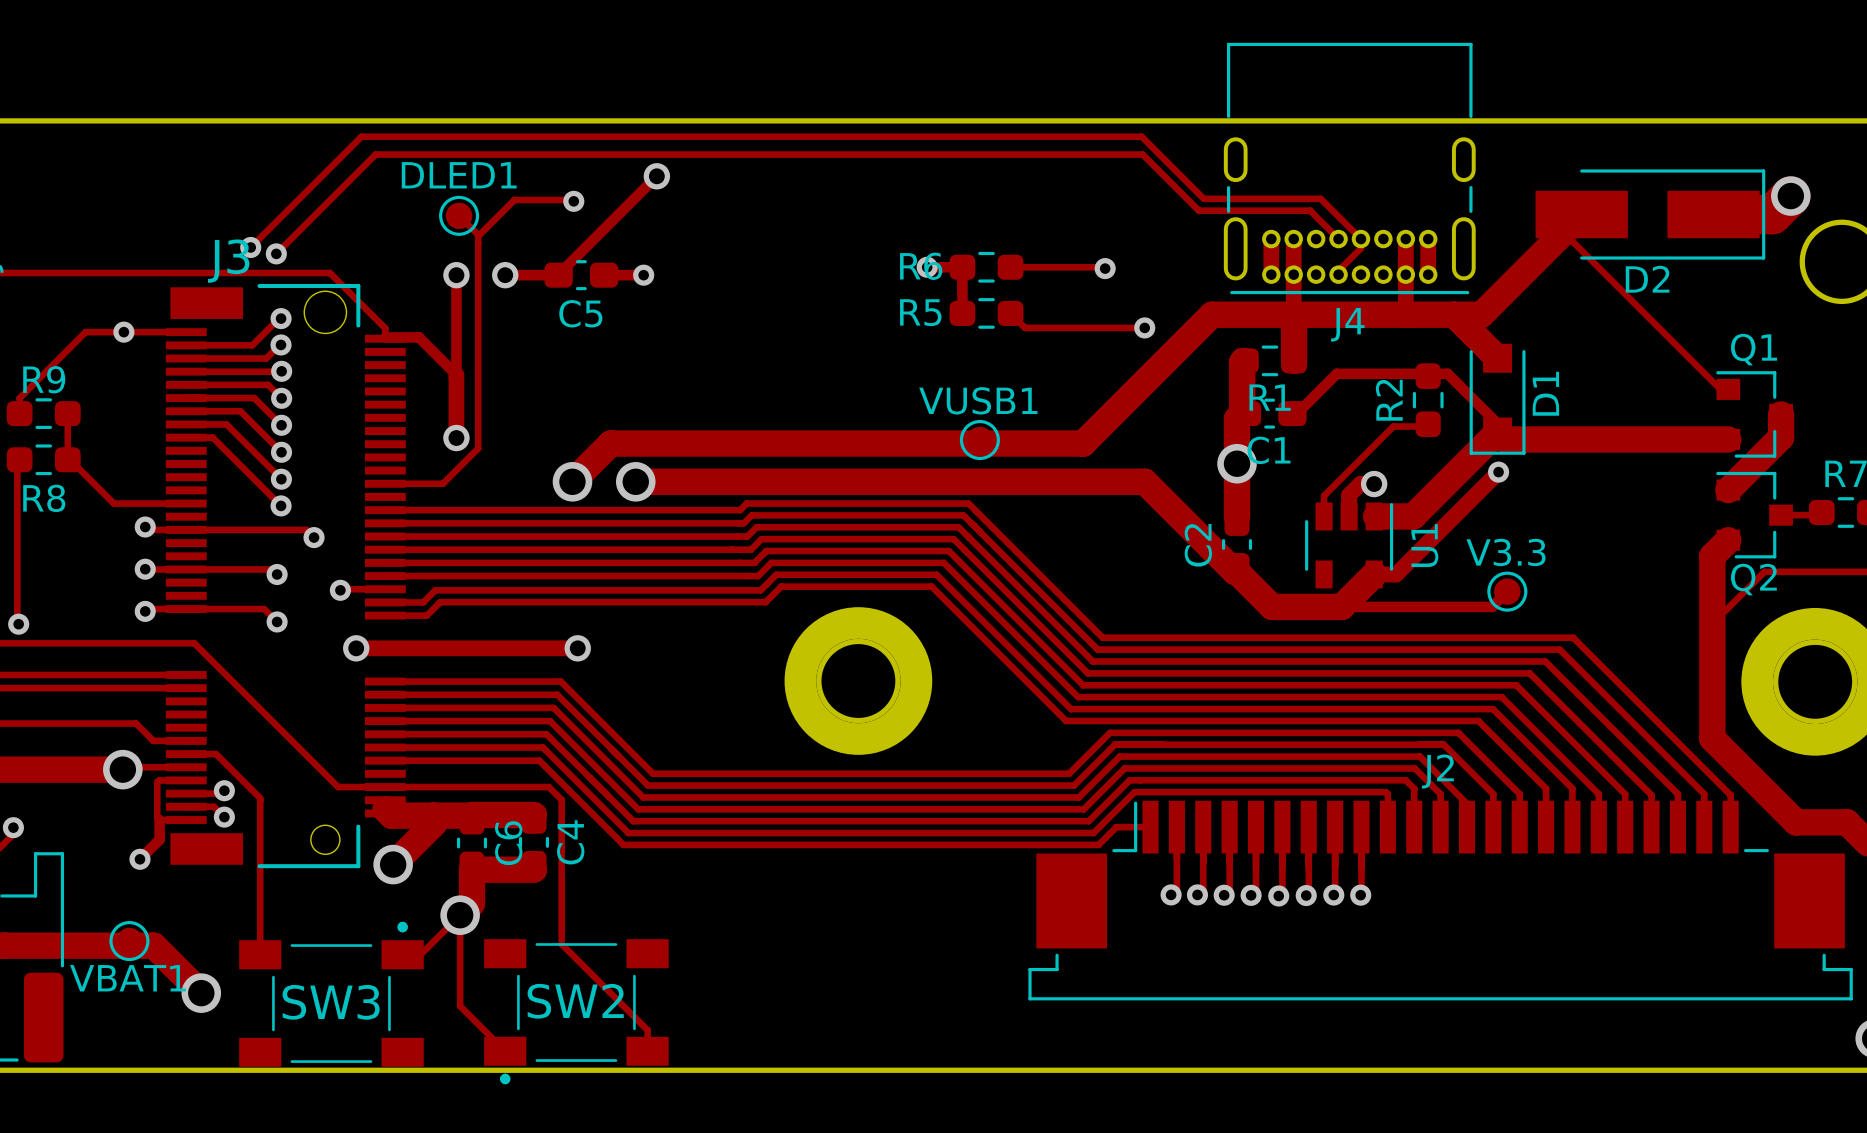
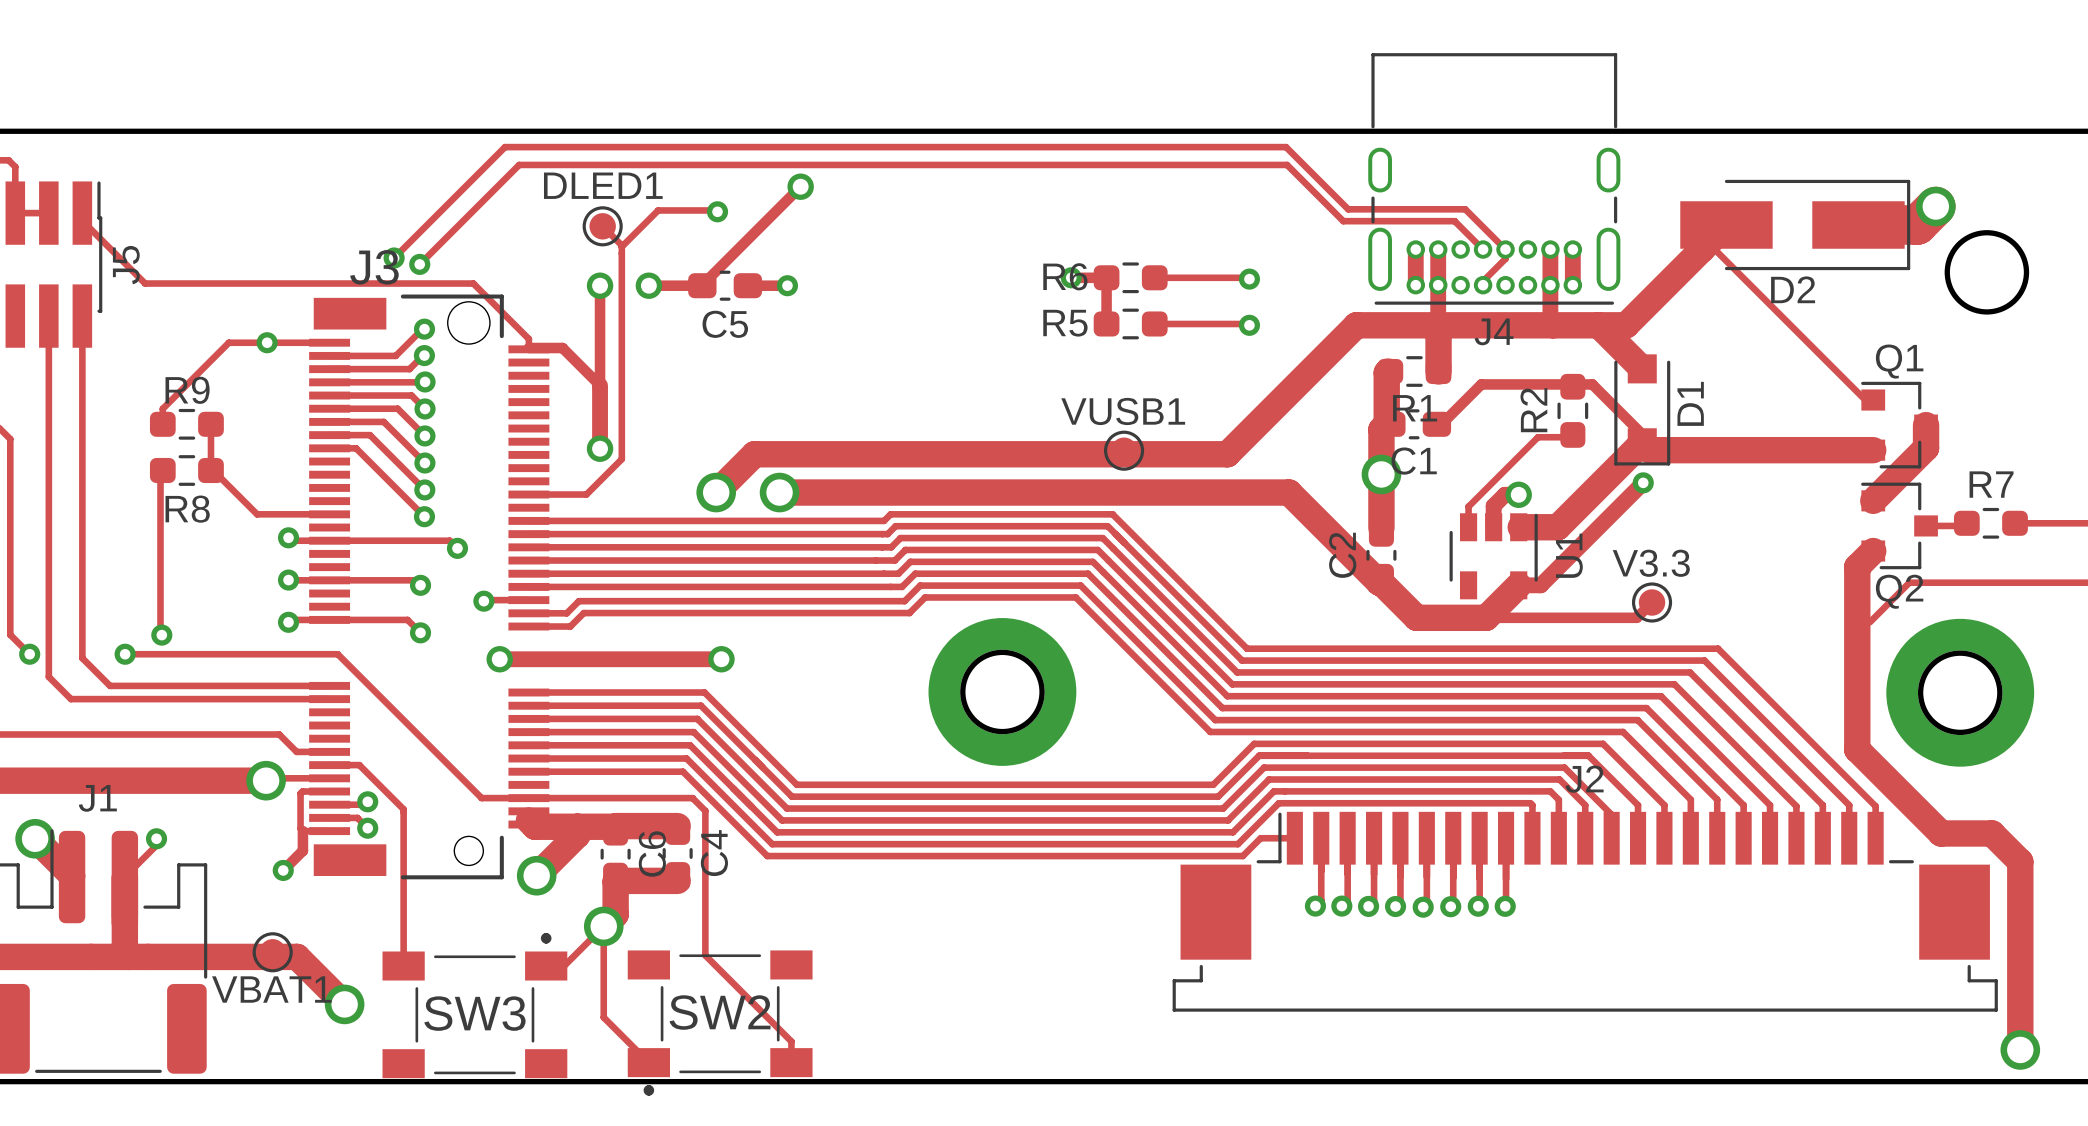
track: (1010, 313) (1025, 327) (1144, 327) -> (1154, 323) (1249, 325)
via position: (1144, 327) -> (1249, 325)

